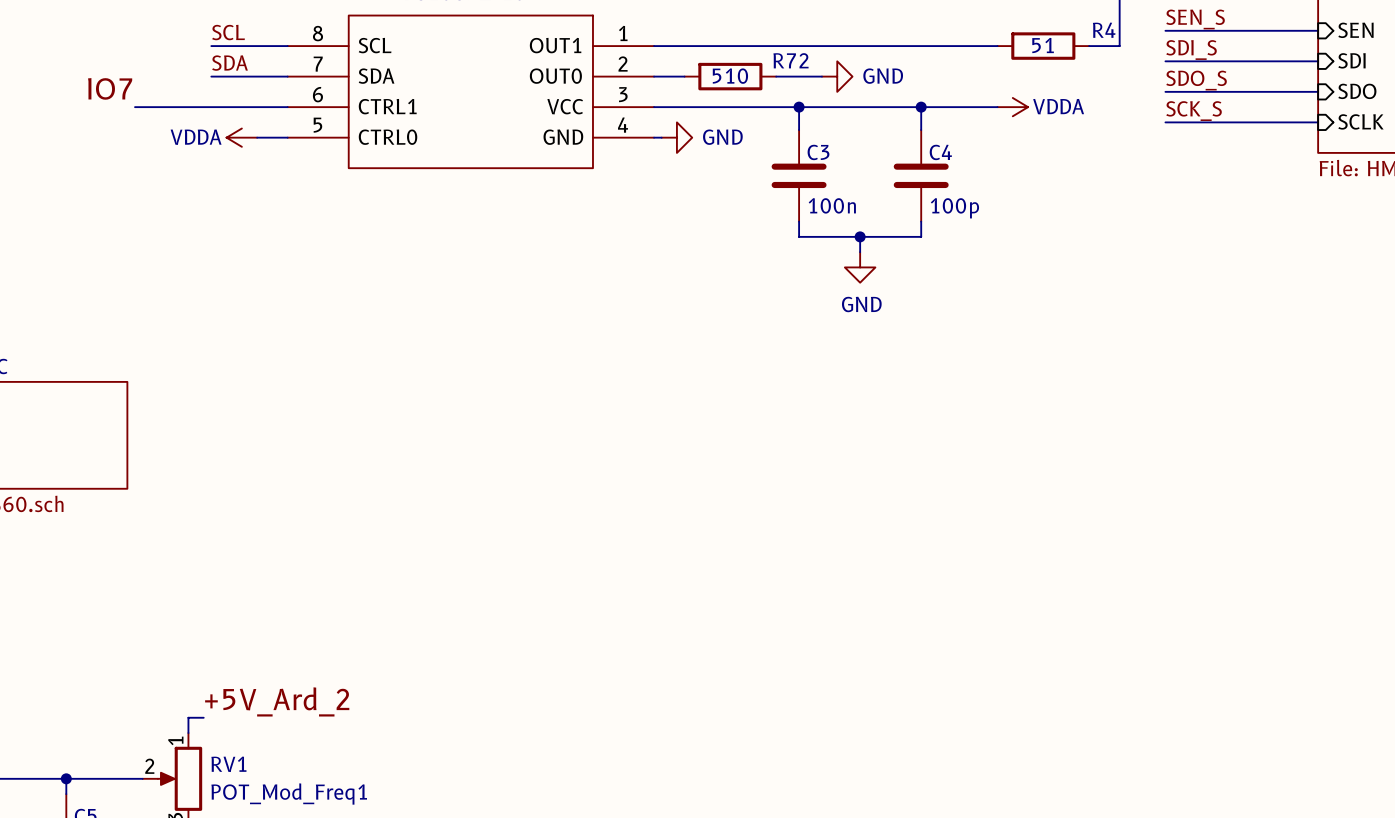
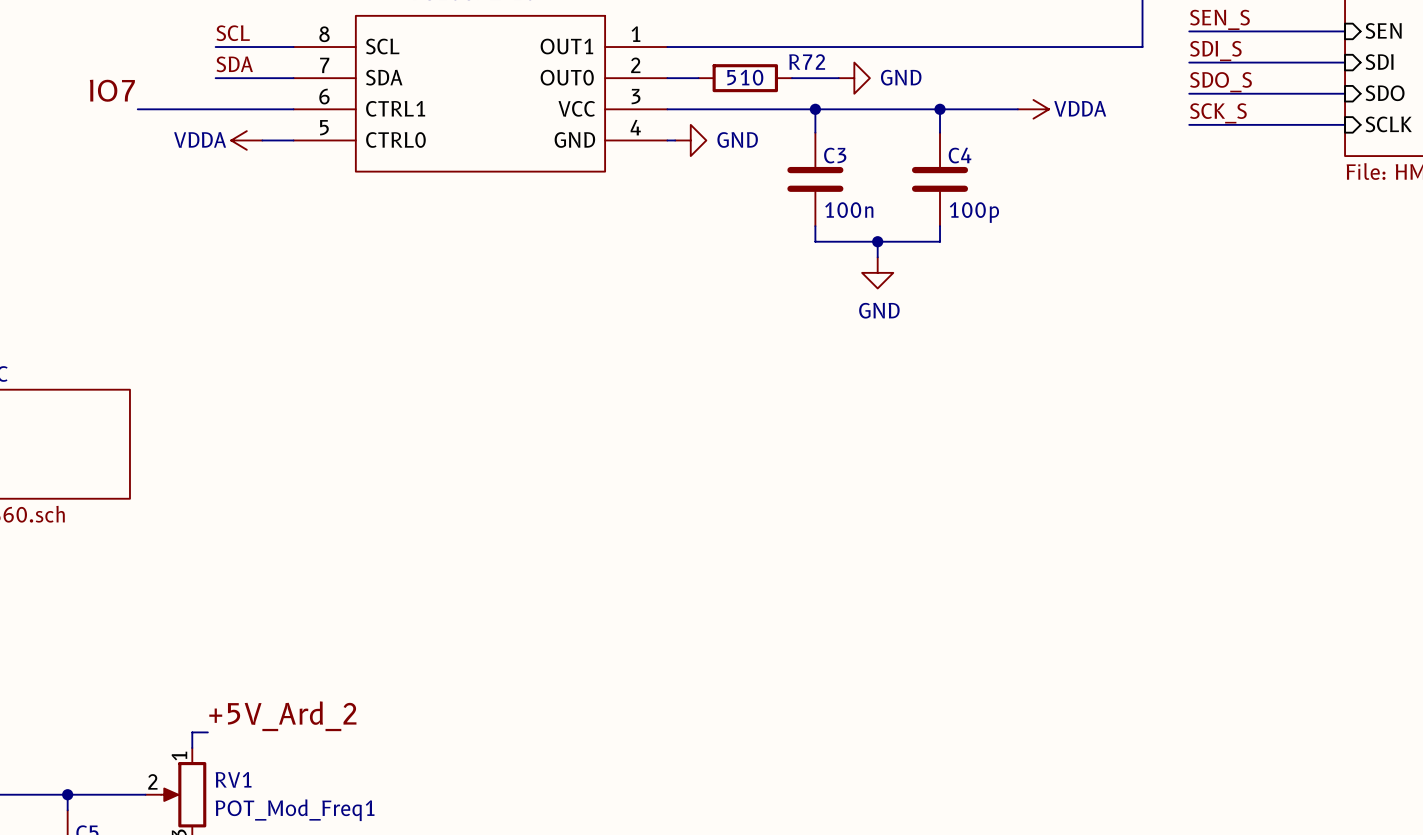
wire: none -> (1017, 47) (1111, 47)
R4: 51 (1043, 46) -> none

